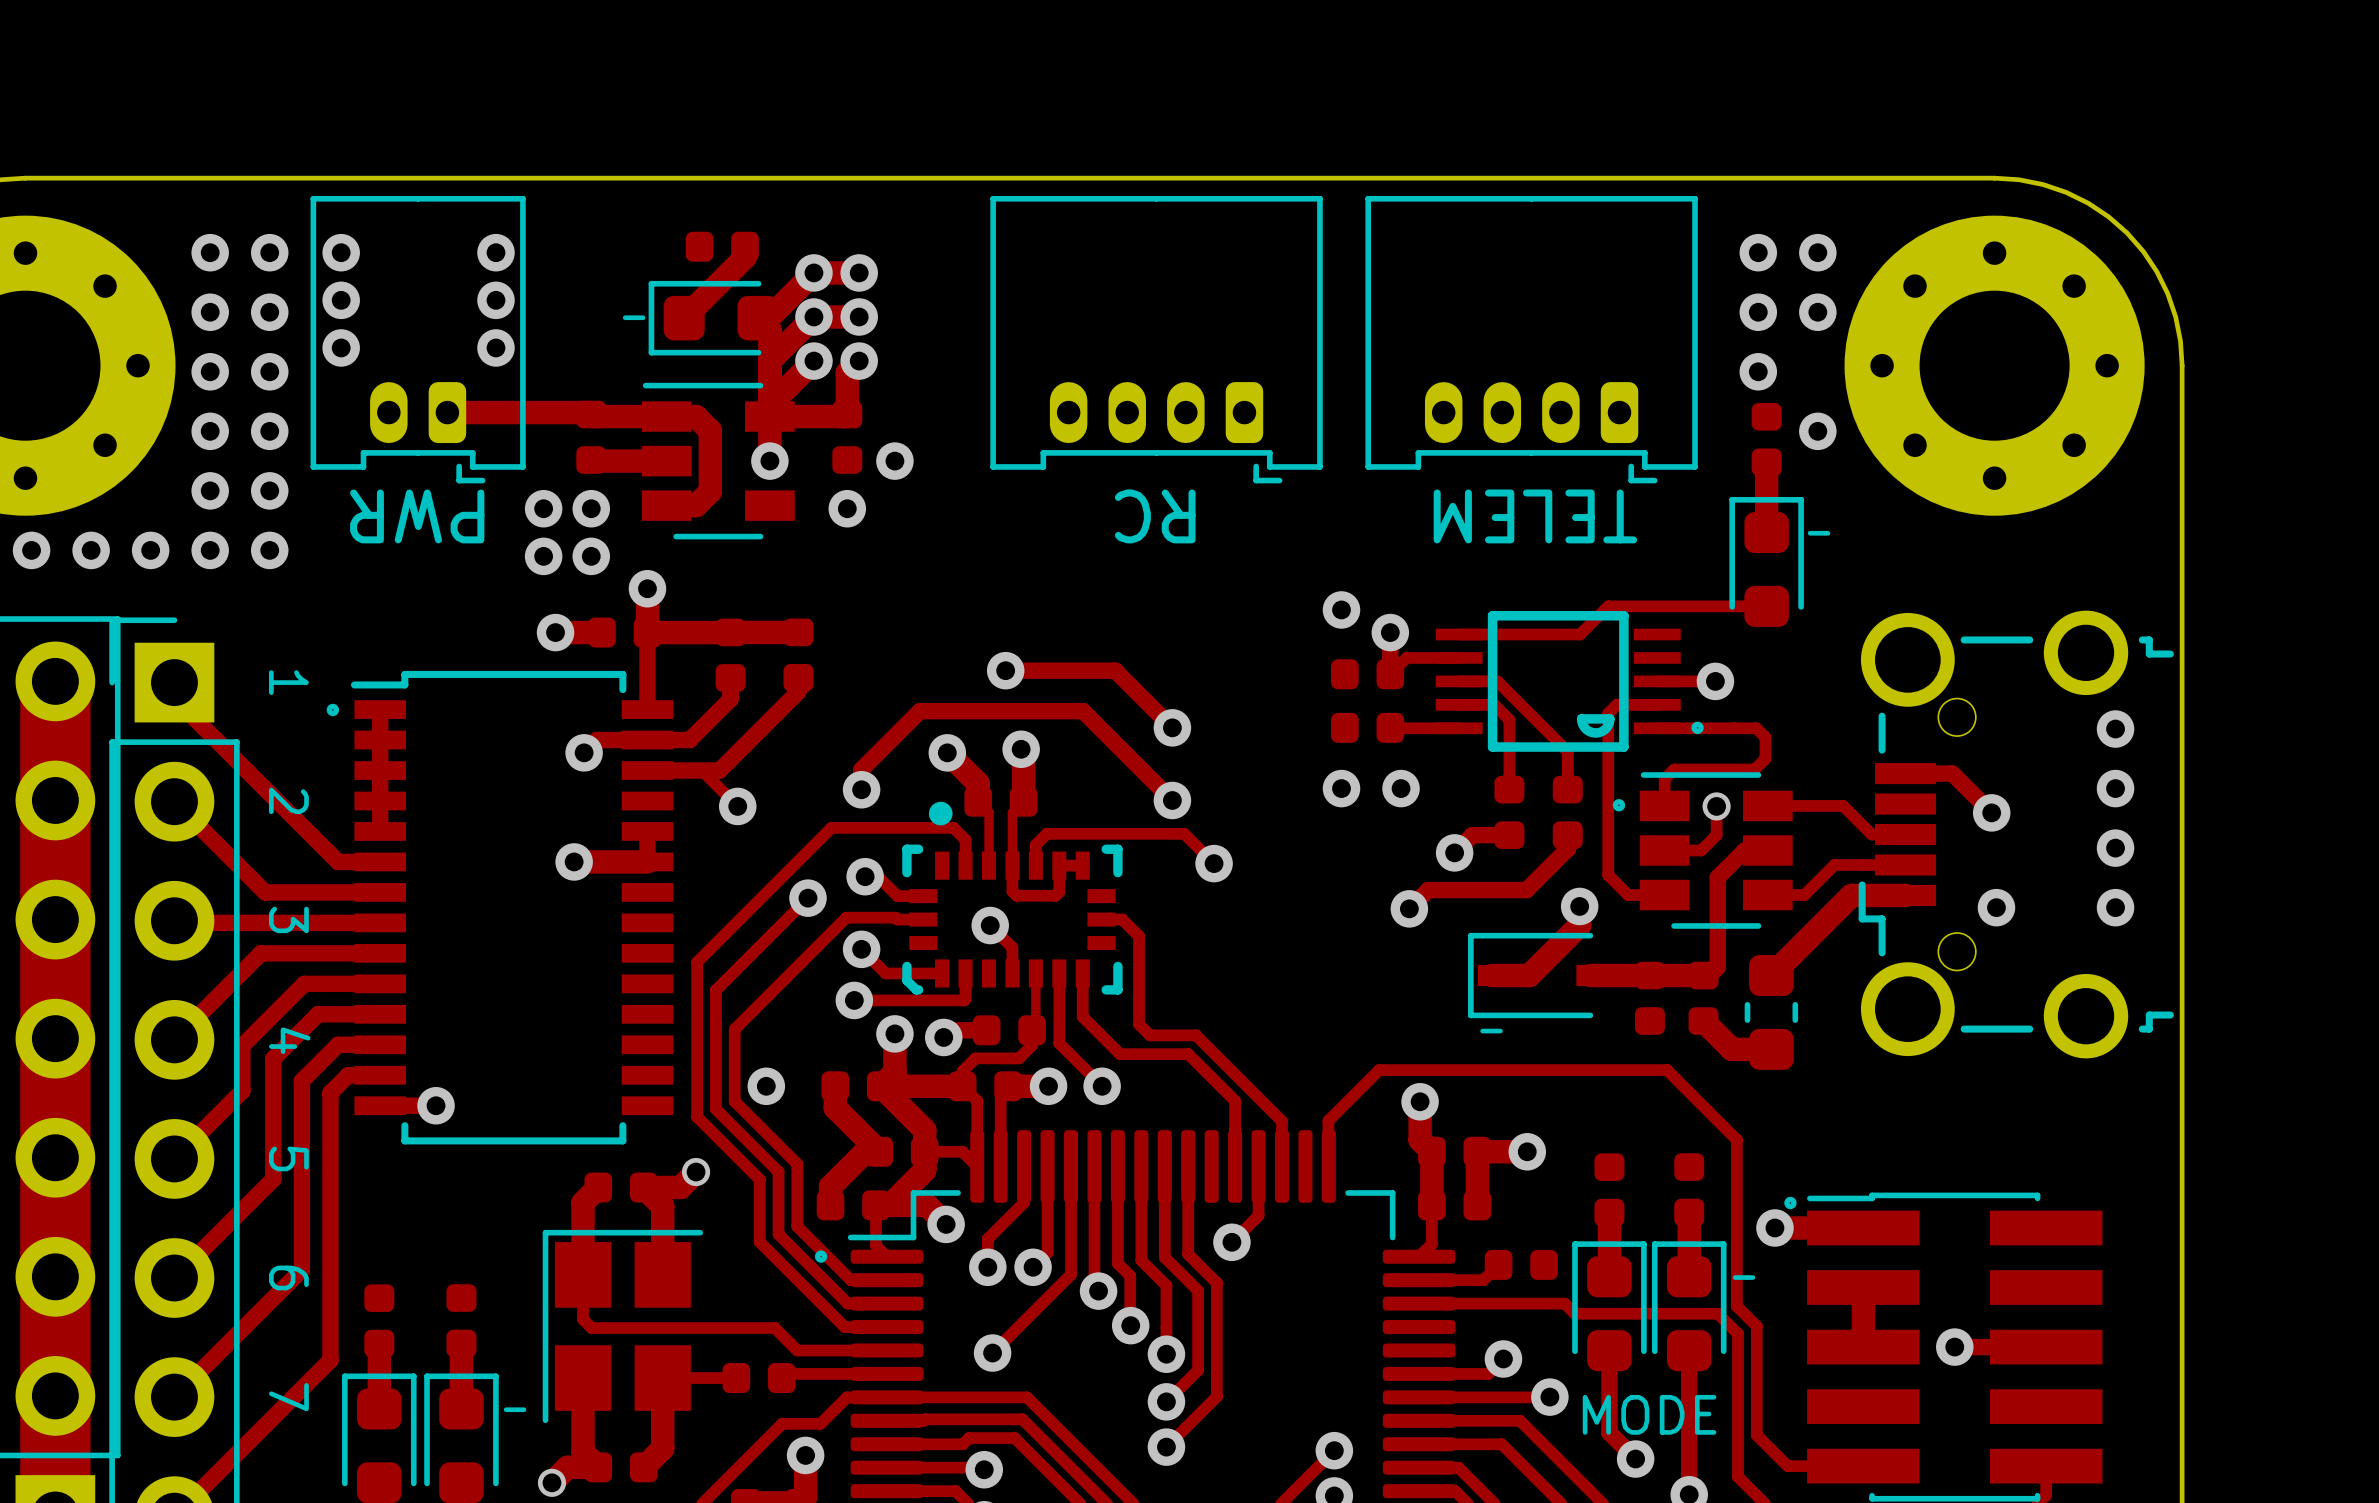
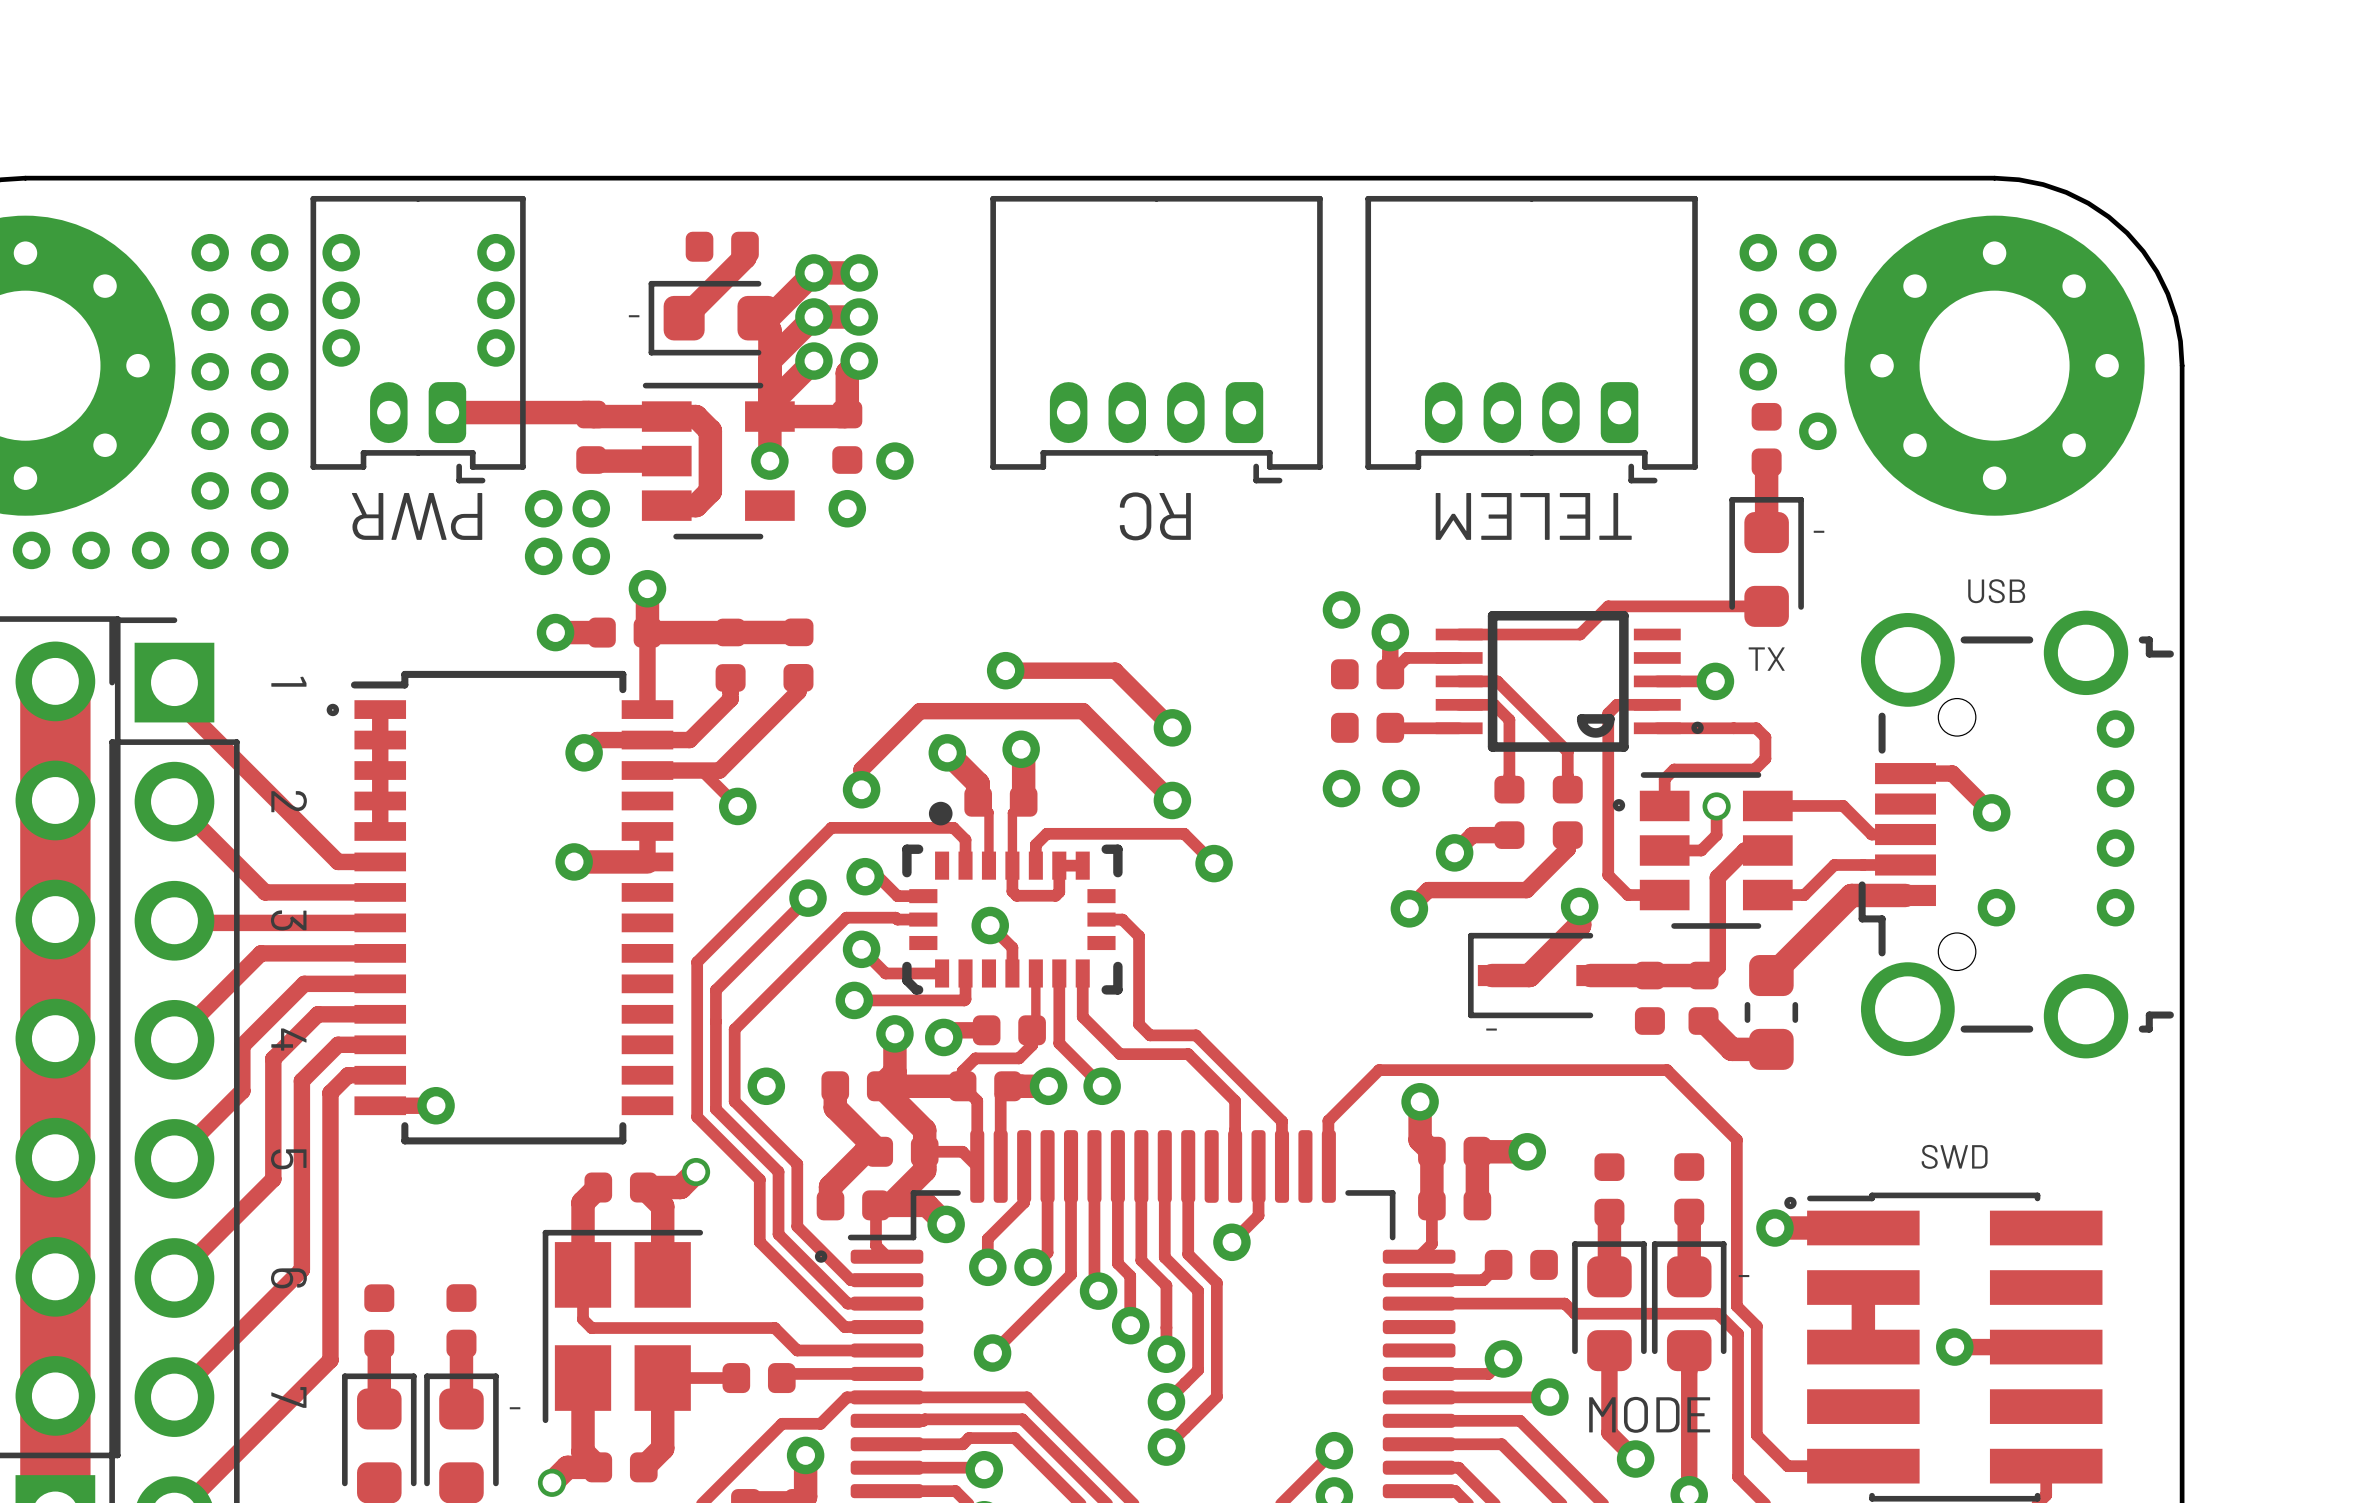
text: none -> USB (1996, 591)
text: none -> TX (1766, 659)
text: none -> SWD (1954, 1156)

